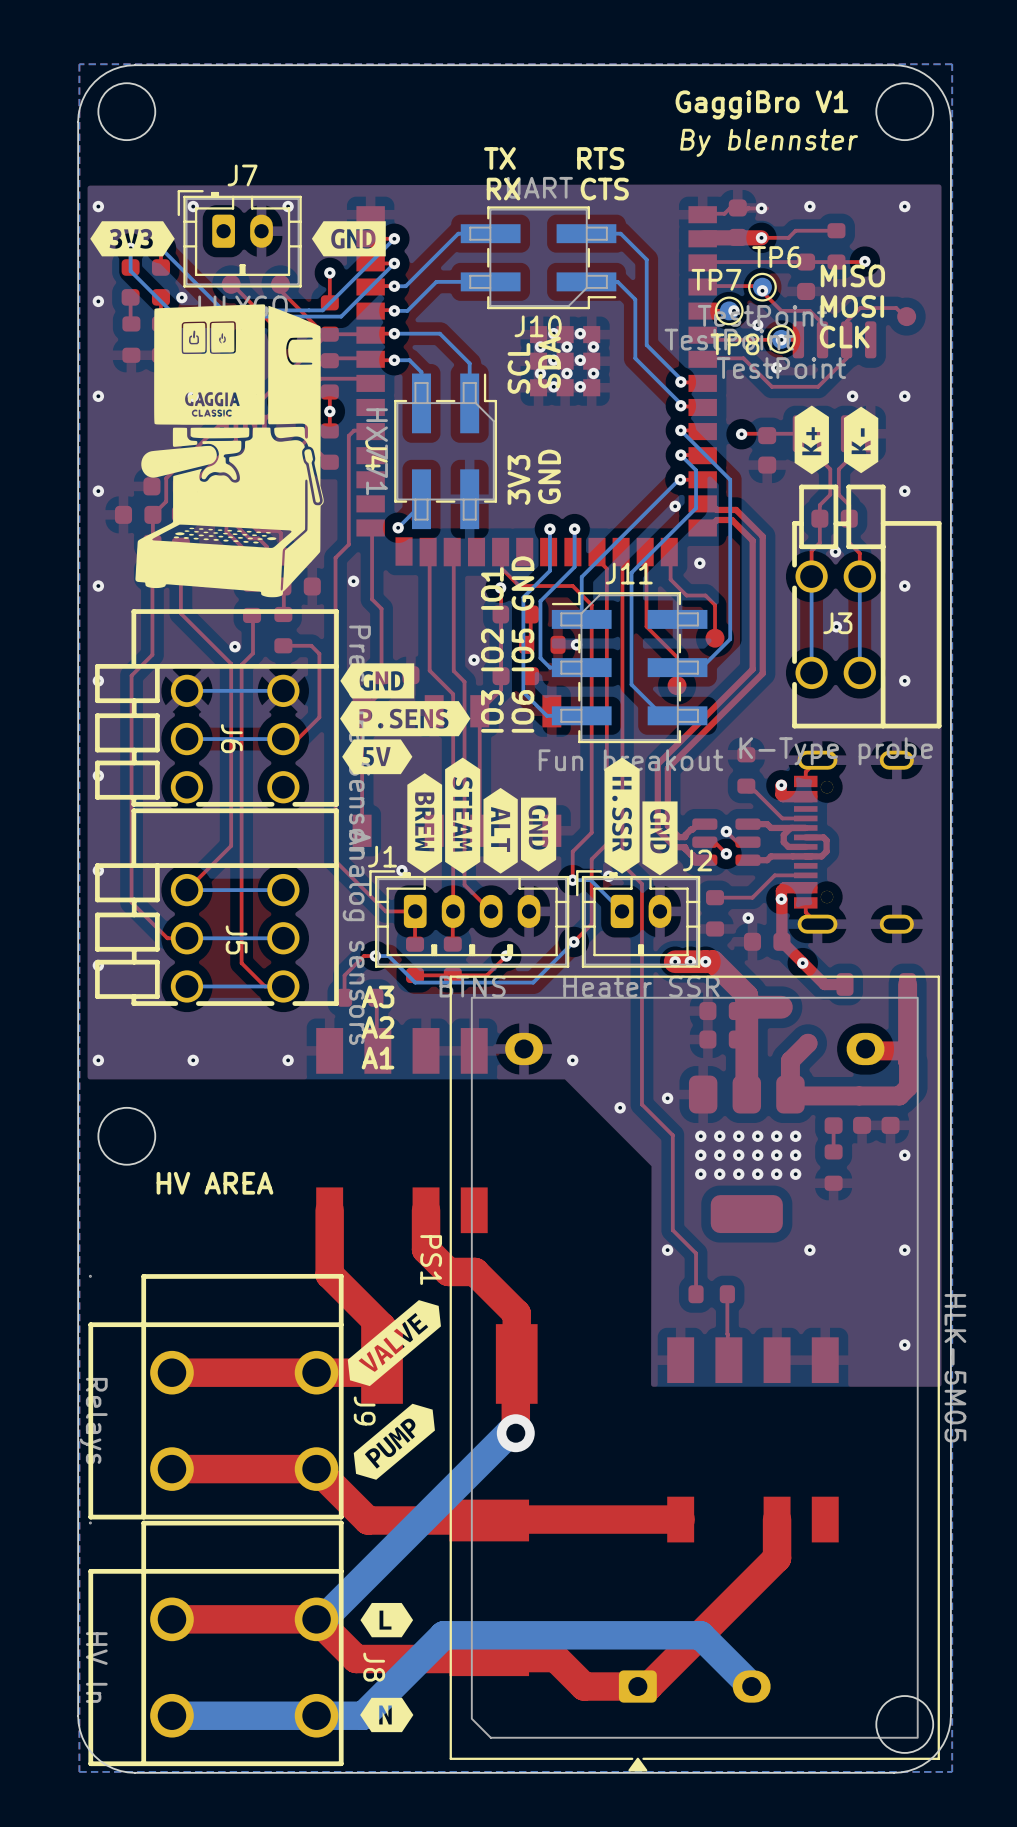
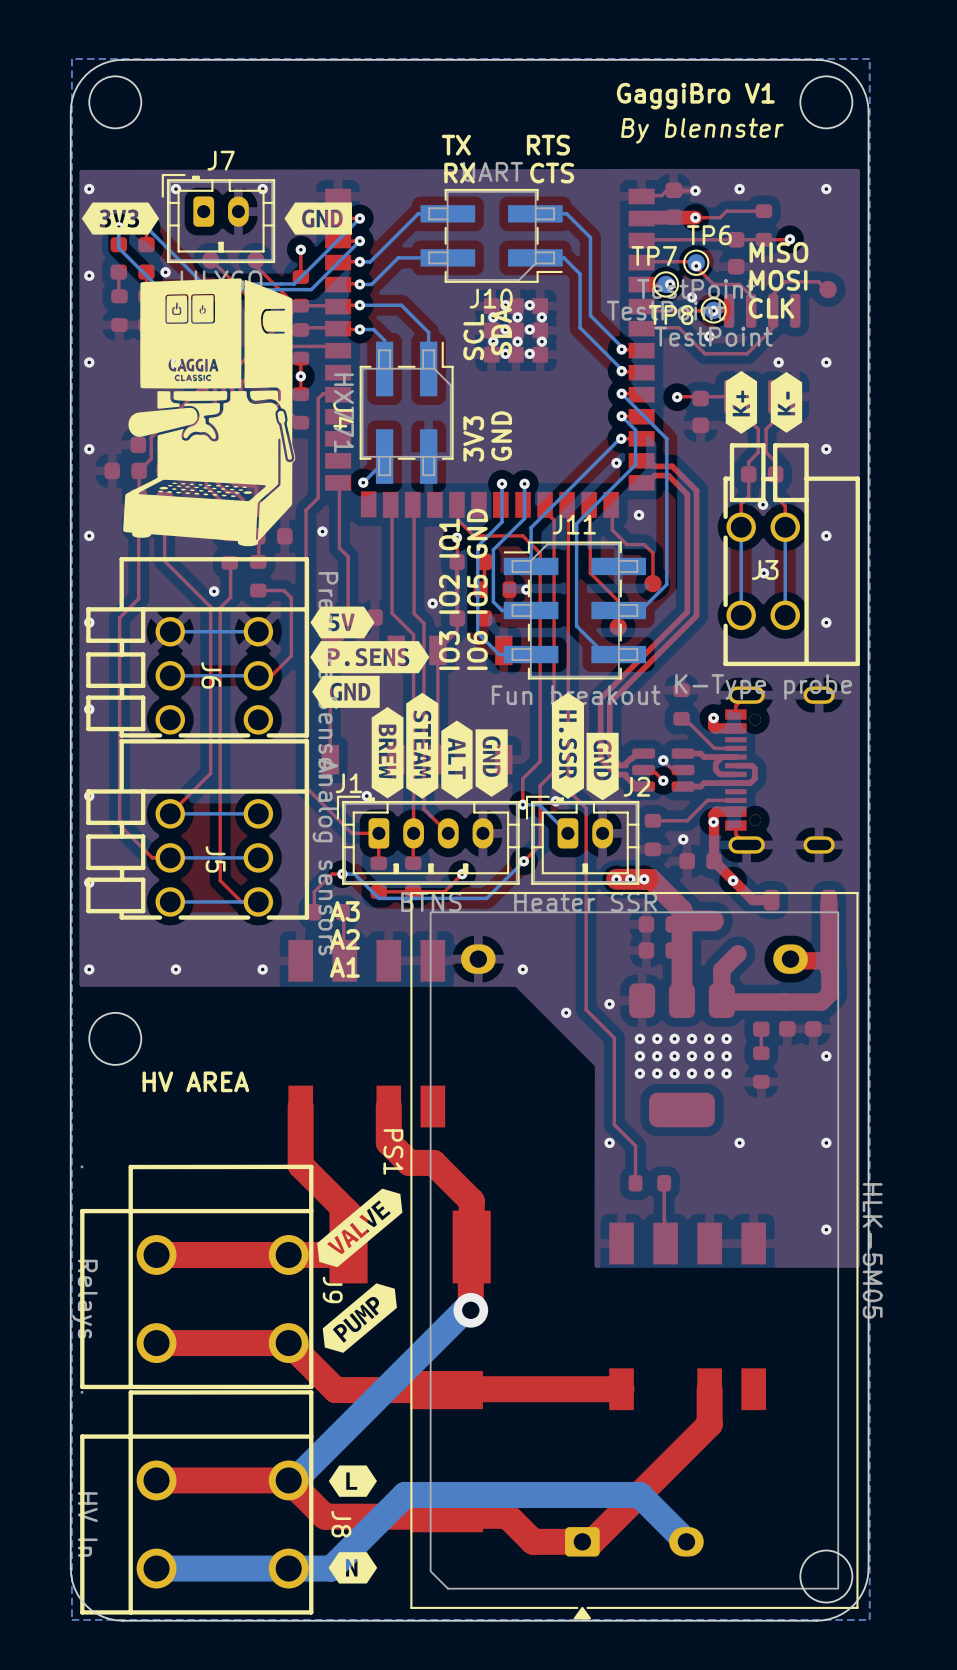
drawing position: (377, 680) -> (345, 691)
drawing position: (377, 756) -> (342, 622)

